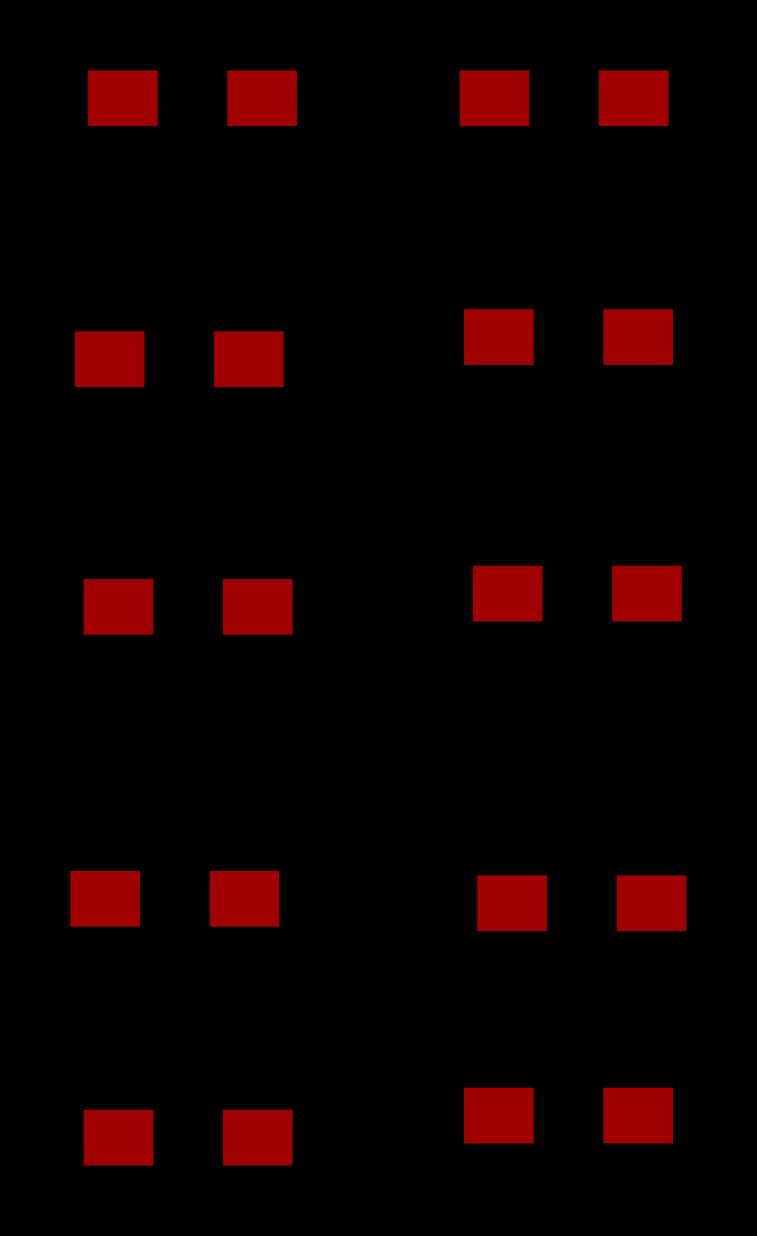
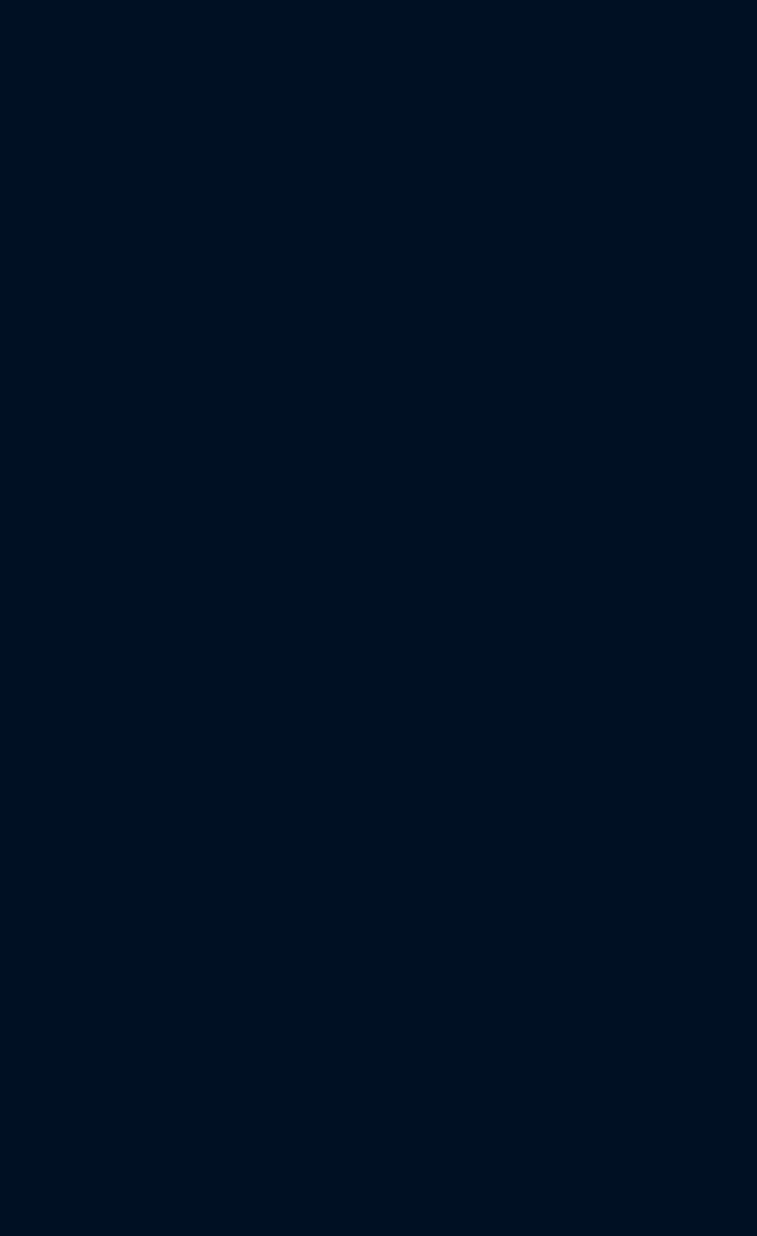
part: (192, 98) -> none
part: (564, 98) -> none
part: (568, 337) -> none
part: (179, 359) -> none
part: (577, 593) -> none
part: (188, 606) -> none
part: (174, 898) -> none
part: (581, 903) -> none
part: (568, 1115) -> none
part: (188, 1137) -> none

